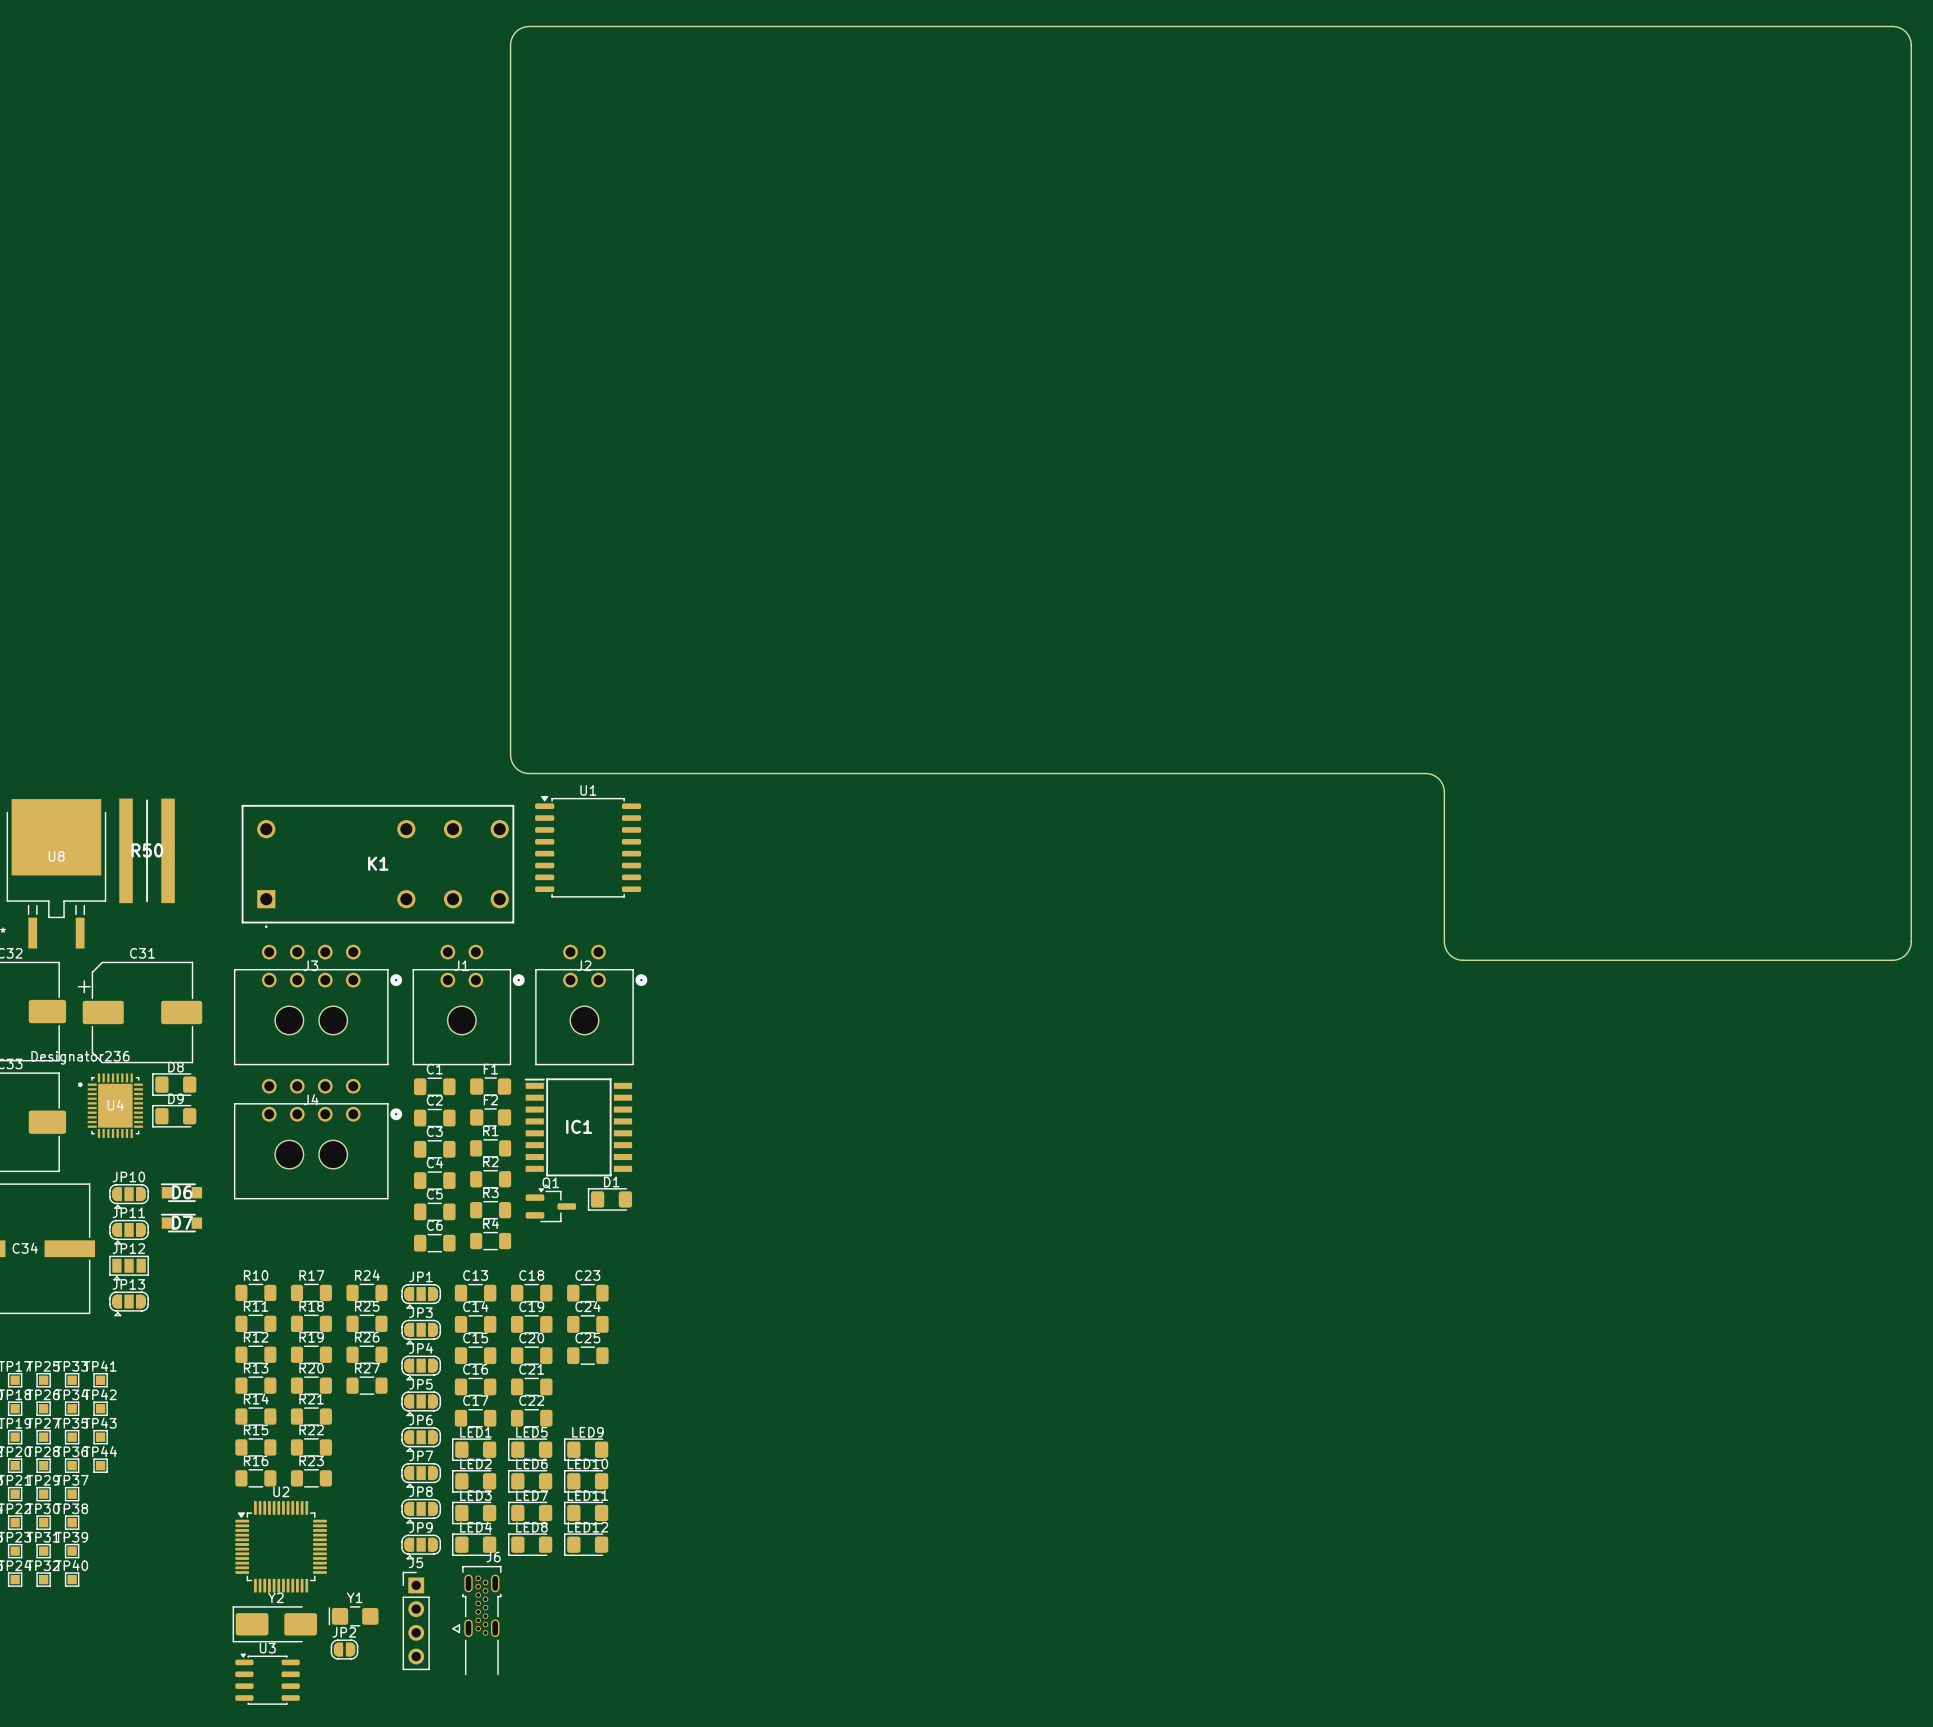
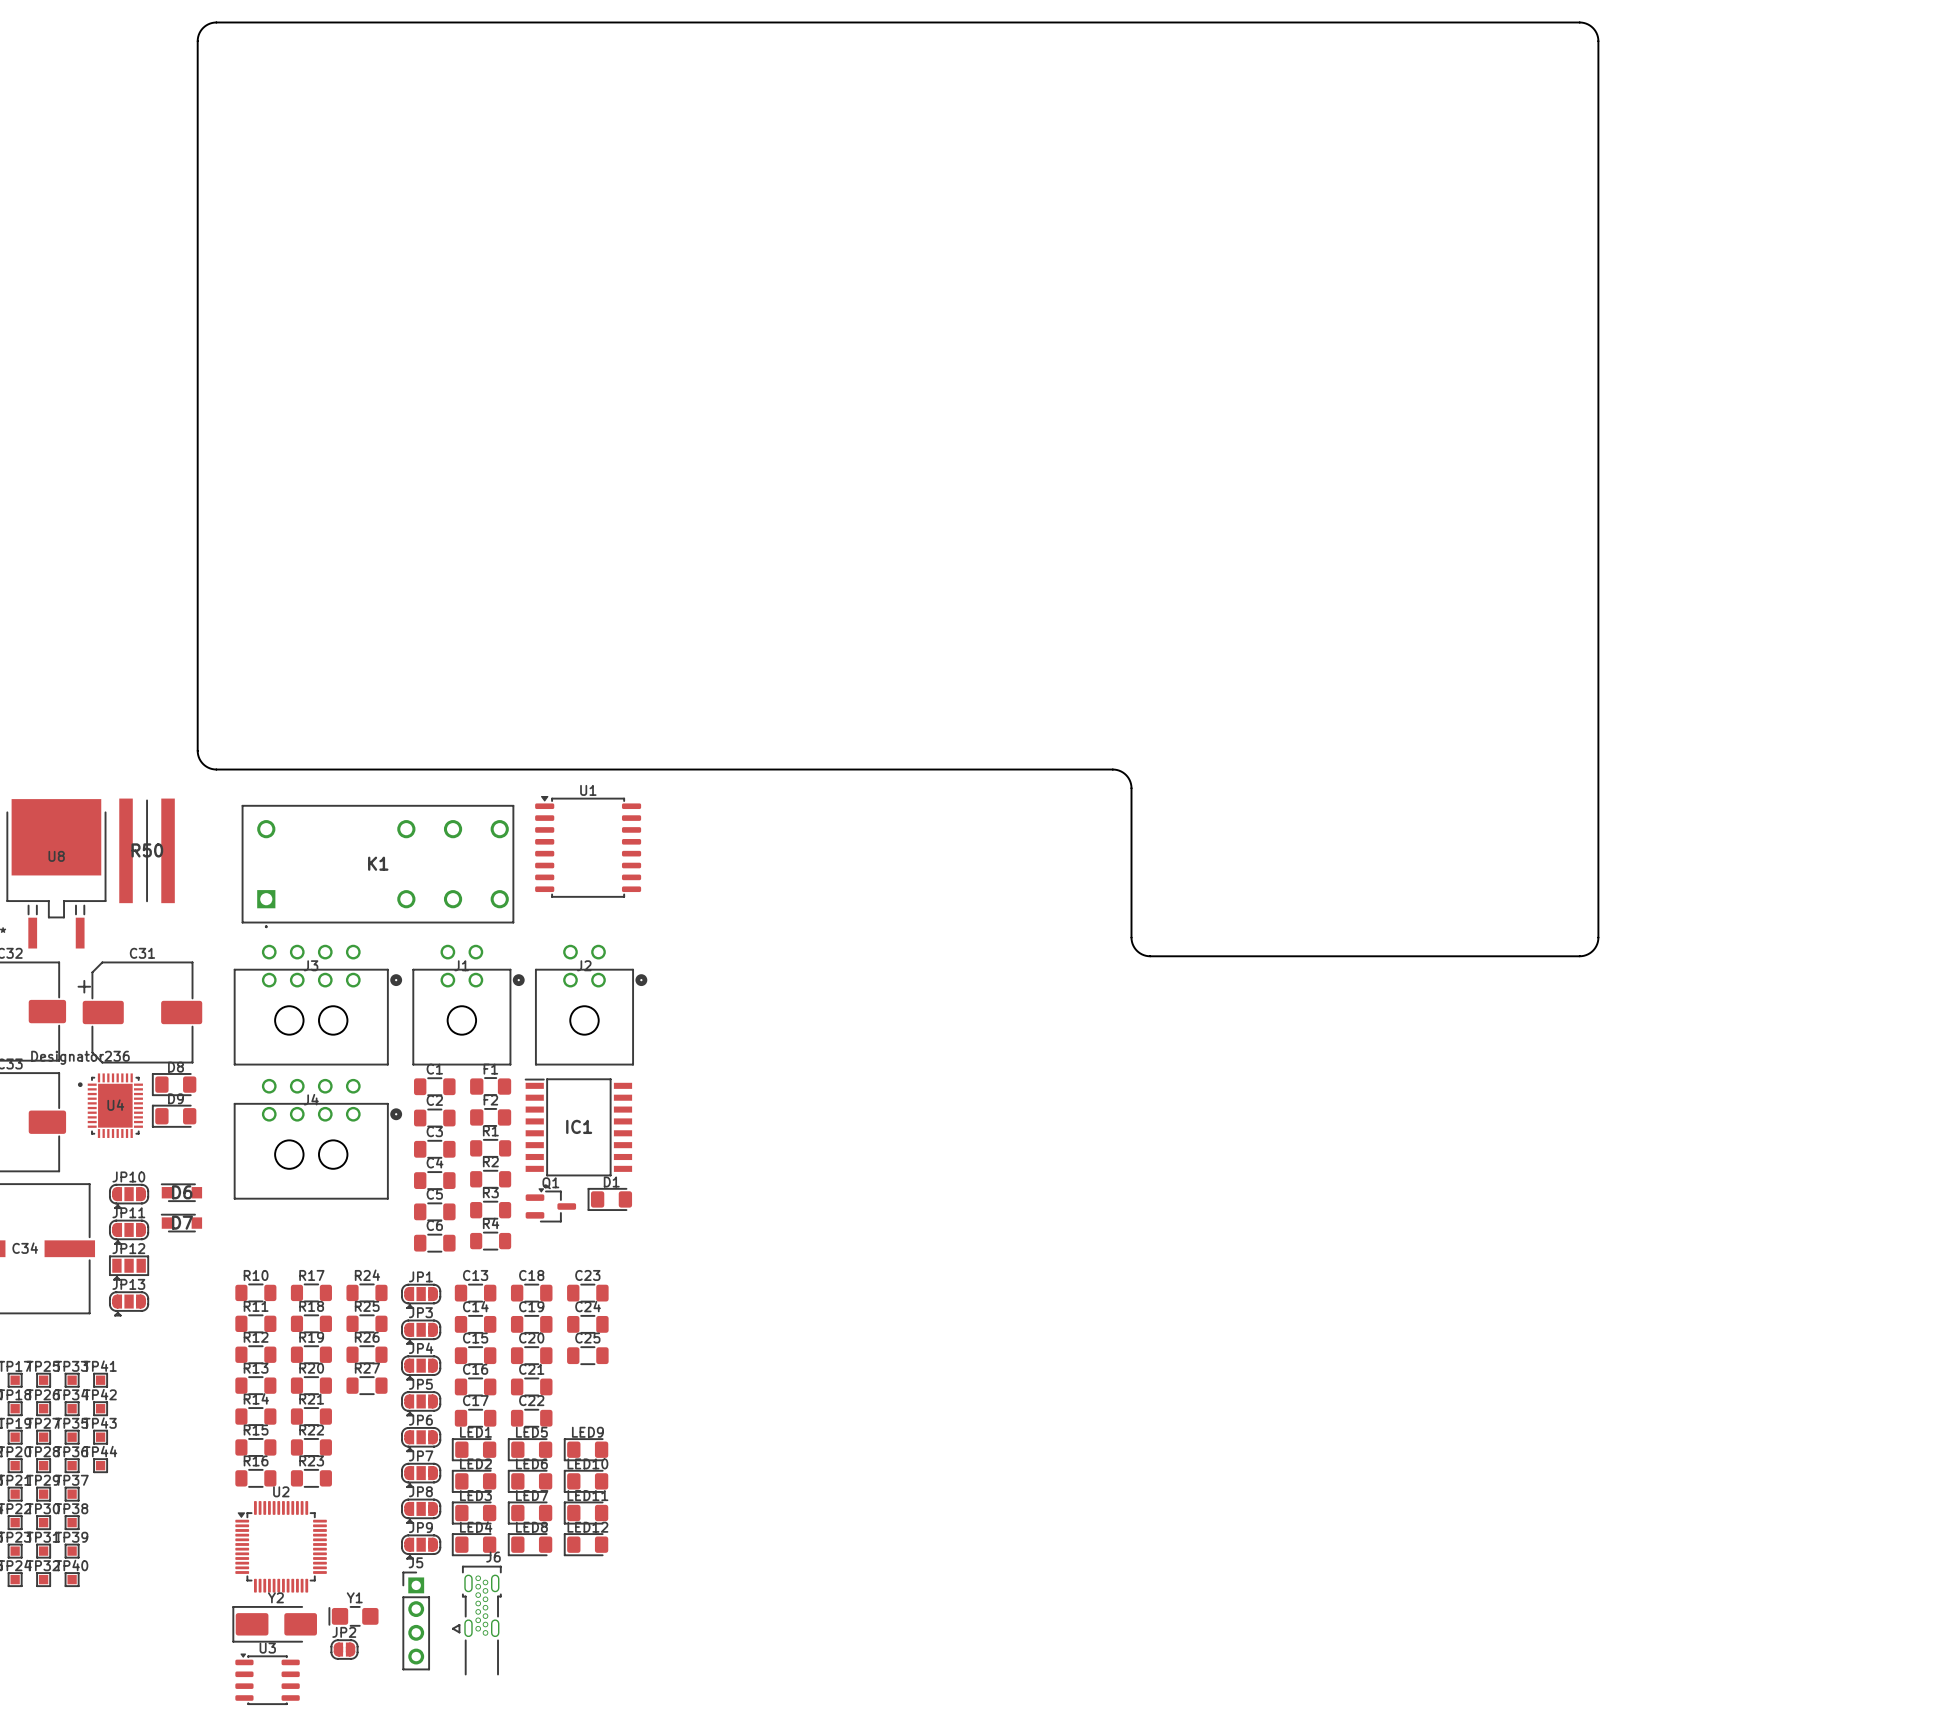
board edge: (529, 26) (1892, 26) (1902, 29) (1909, 37) (1911, 45) (1911, 941) (1908, 951) (1902, 957) (1892, 960) (1456, 959) (1448, 953) (1444, 943) (1444, 790) (1438, 779) (1427, 773) (529, 773) (519, 770) (513, 764) (510, 754) (510, 45) (516, 31) (529, 26) -> (216, 22) (1579, 22) (1589, 25) (1596, 33) (1598, 41) (1598, 937) (1595, 947) (1587, 954) (1579, 956) (1144, 955) (1135, 949) (1131, 939) (1131, 786) (1126, 774) (1114, 769) (216, 769) (206, 766) (199, 758) (197, 750) (197, 41) (203, 27) (216, 22)

